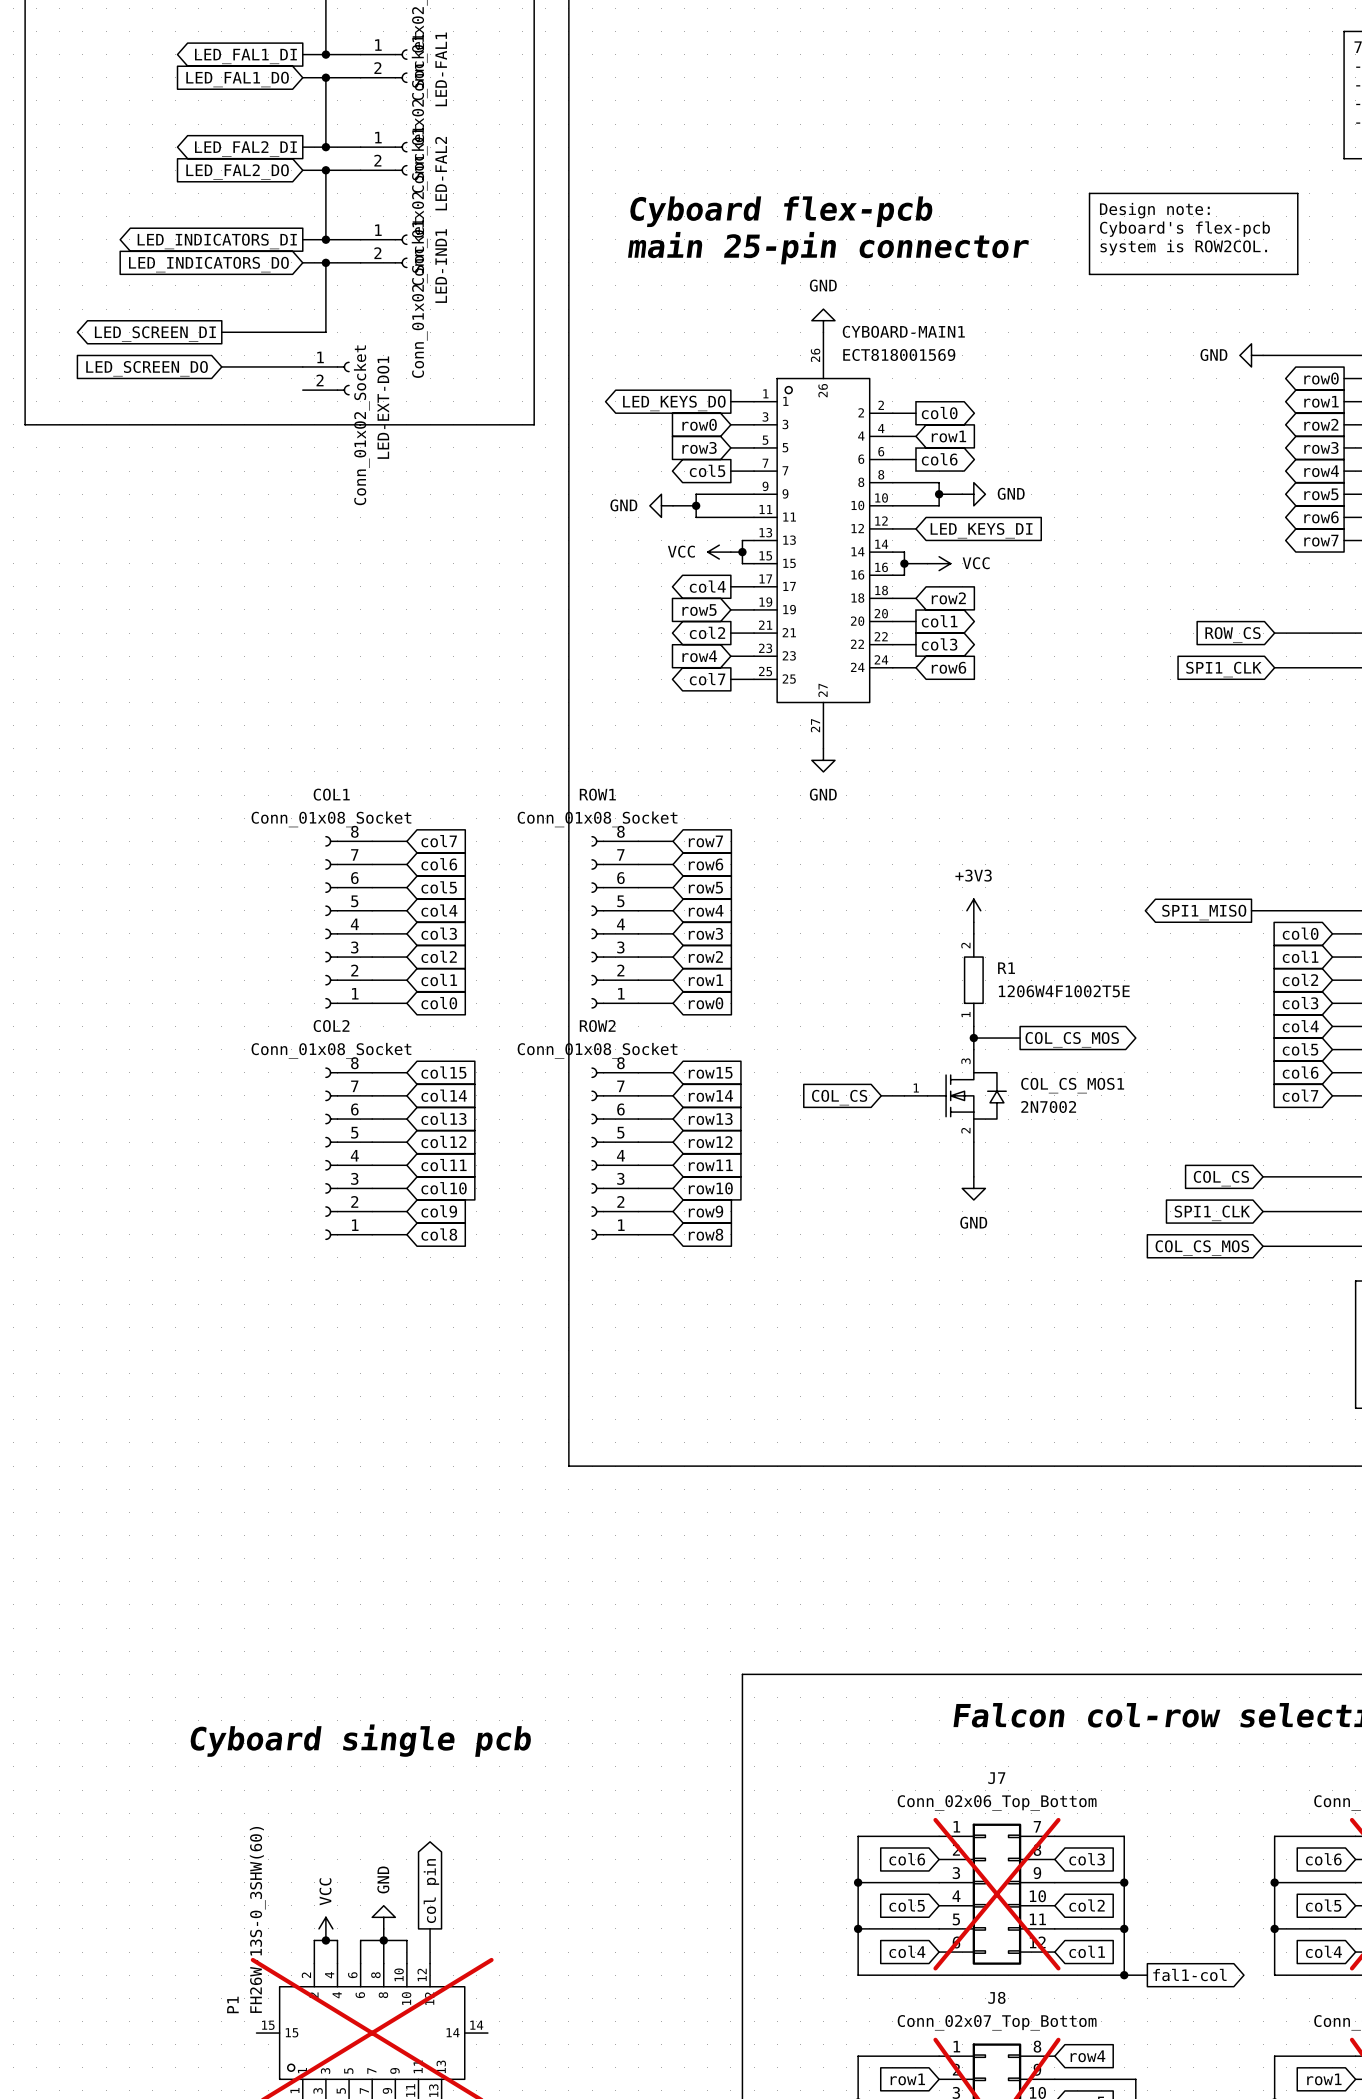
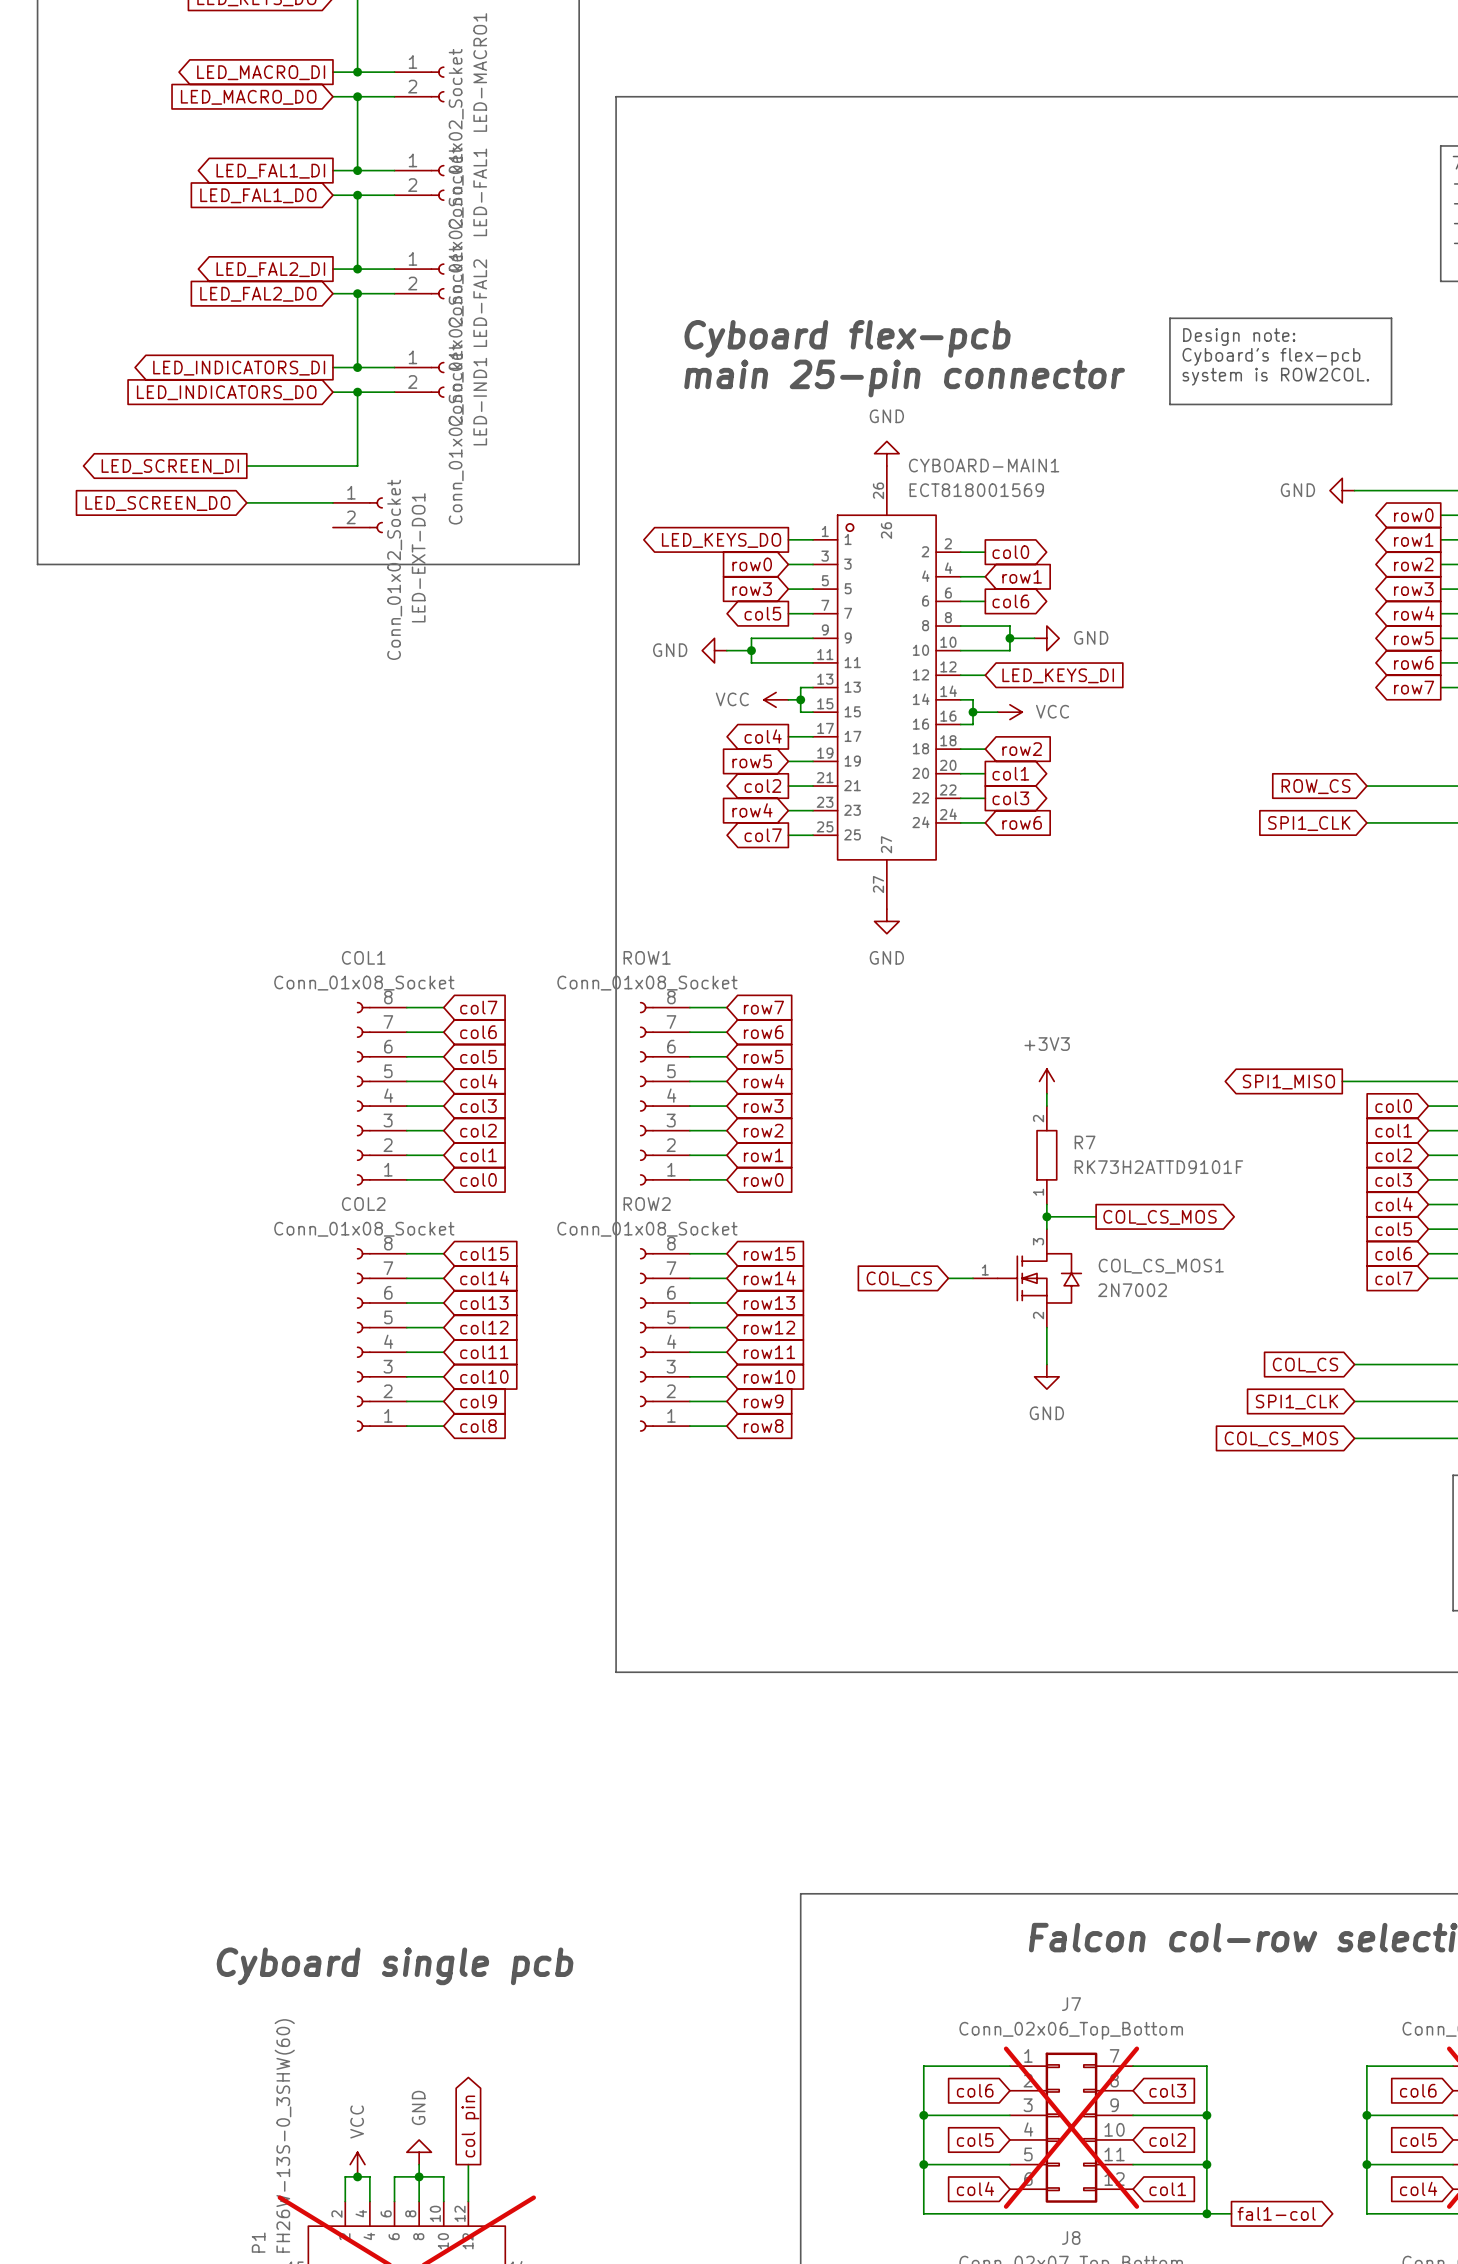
R1 name: R1 (1006, 968) -> R7 (1085, 1142)
R1 value: 1206W4F1002T5E (1064, 991) -> RK73H2ATTD9101F (1158, 1167)

